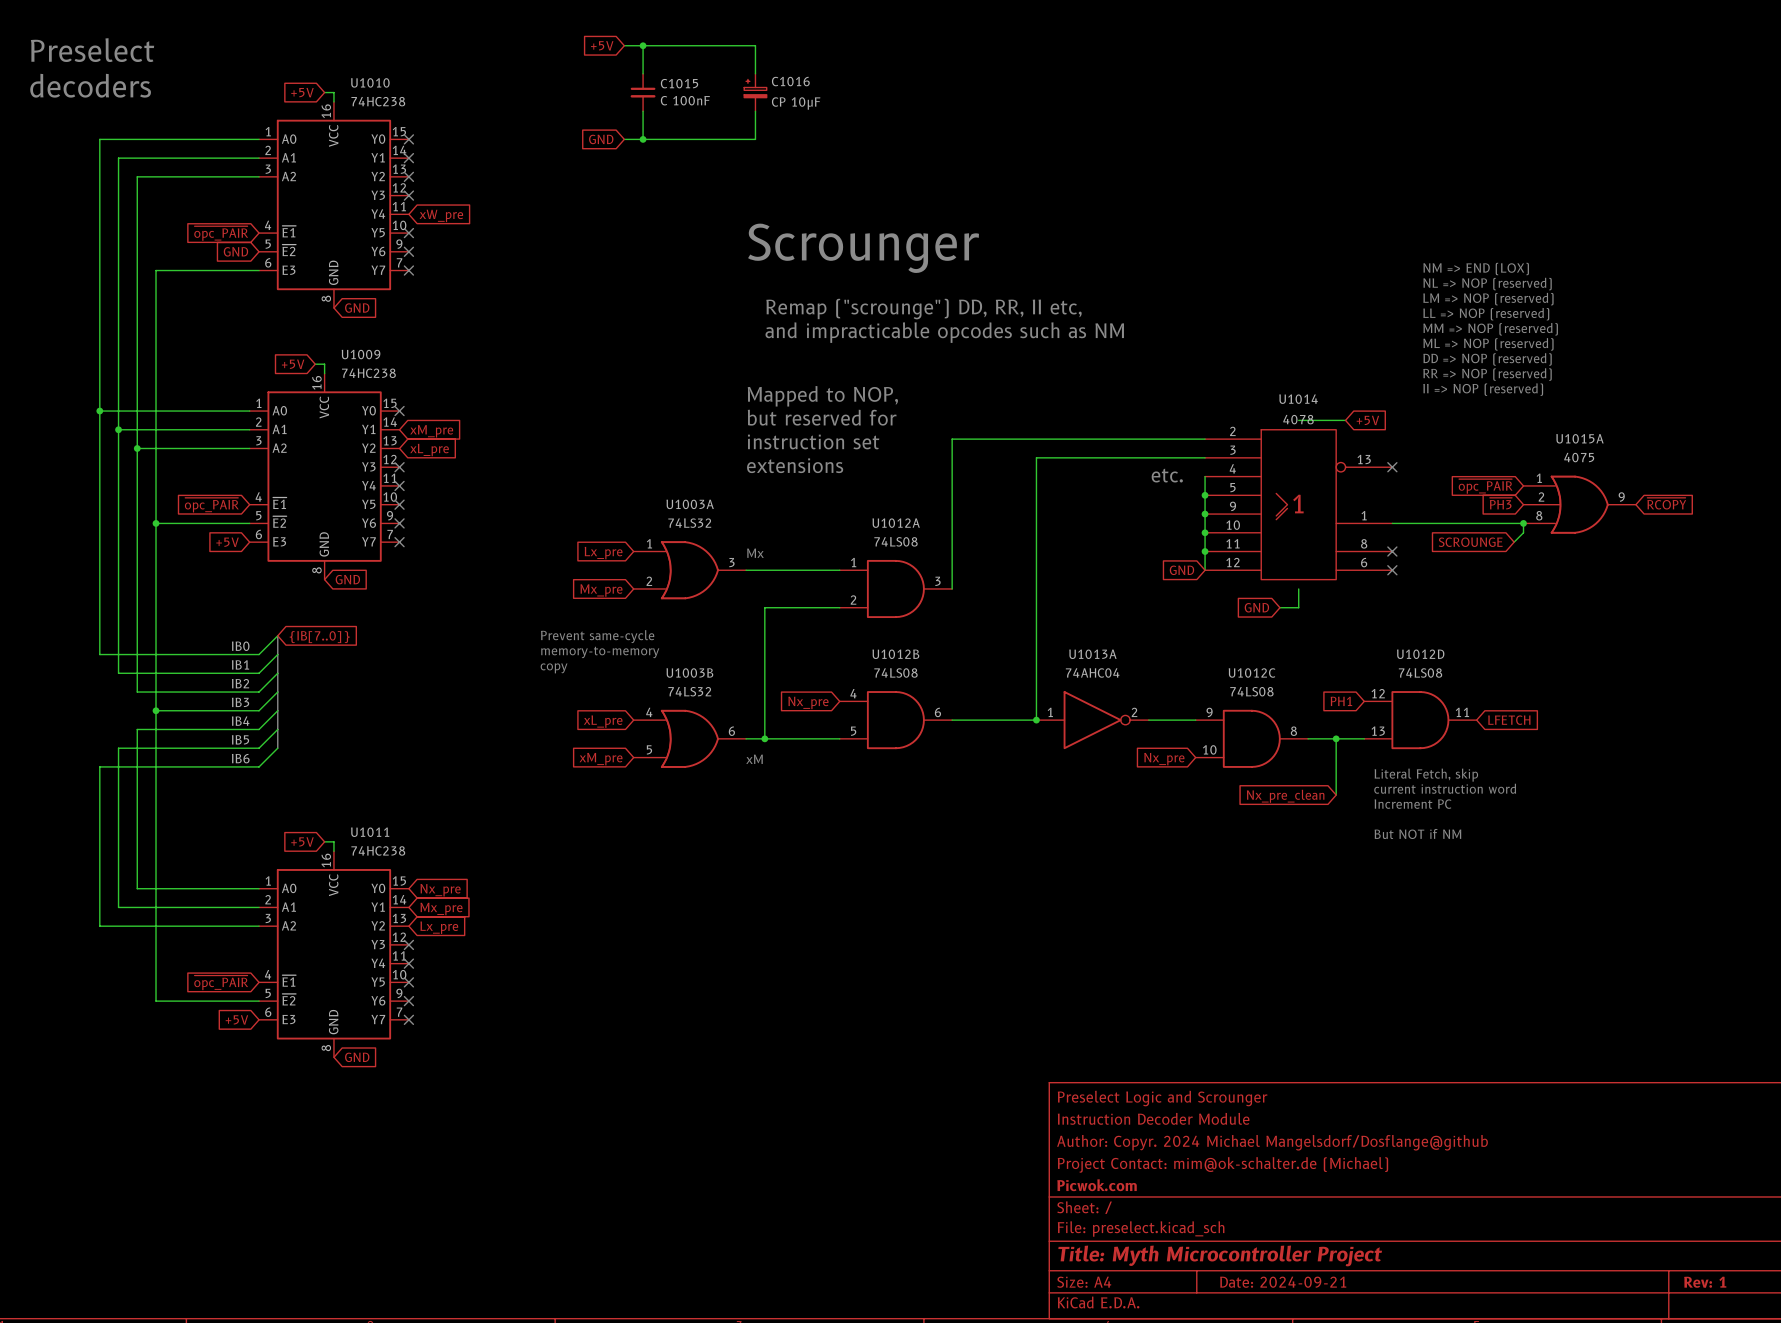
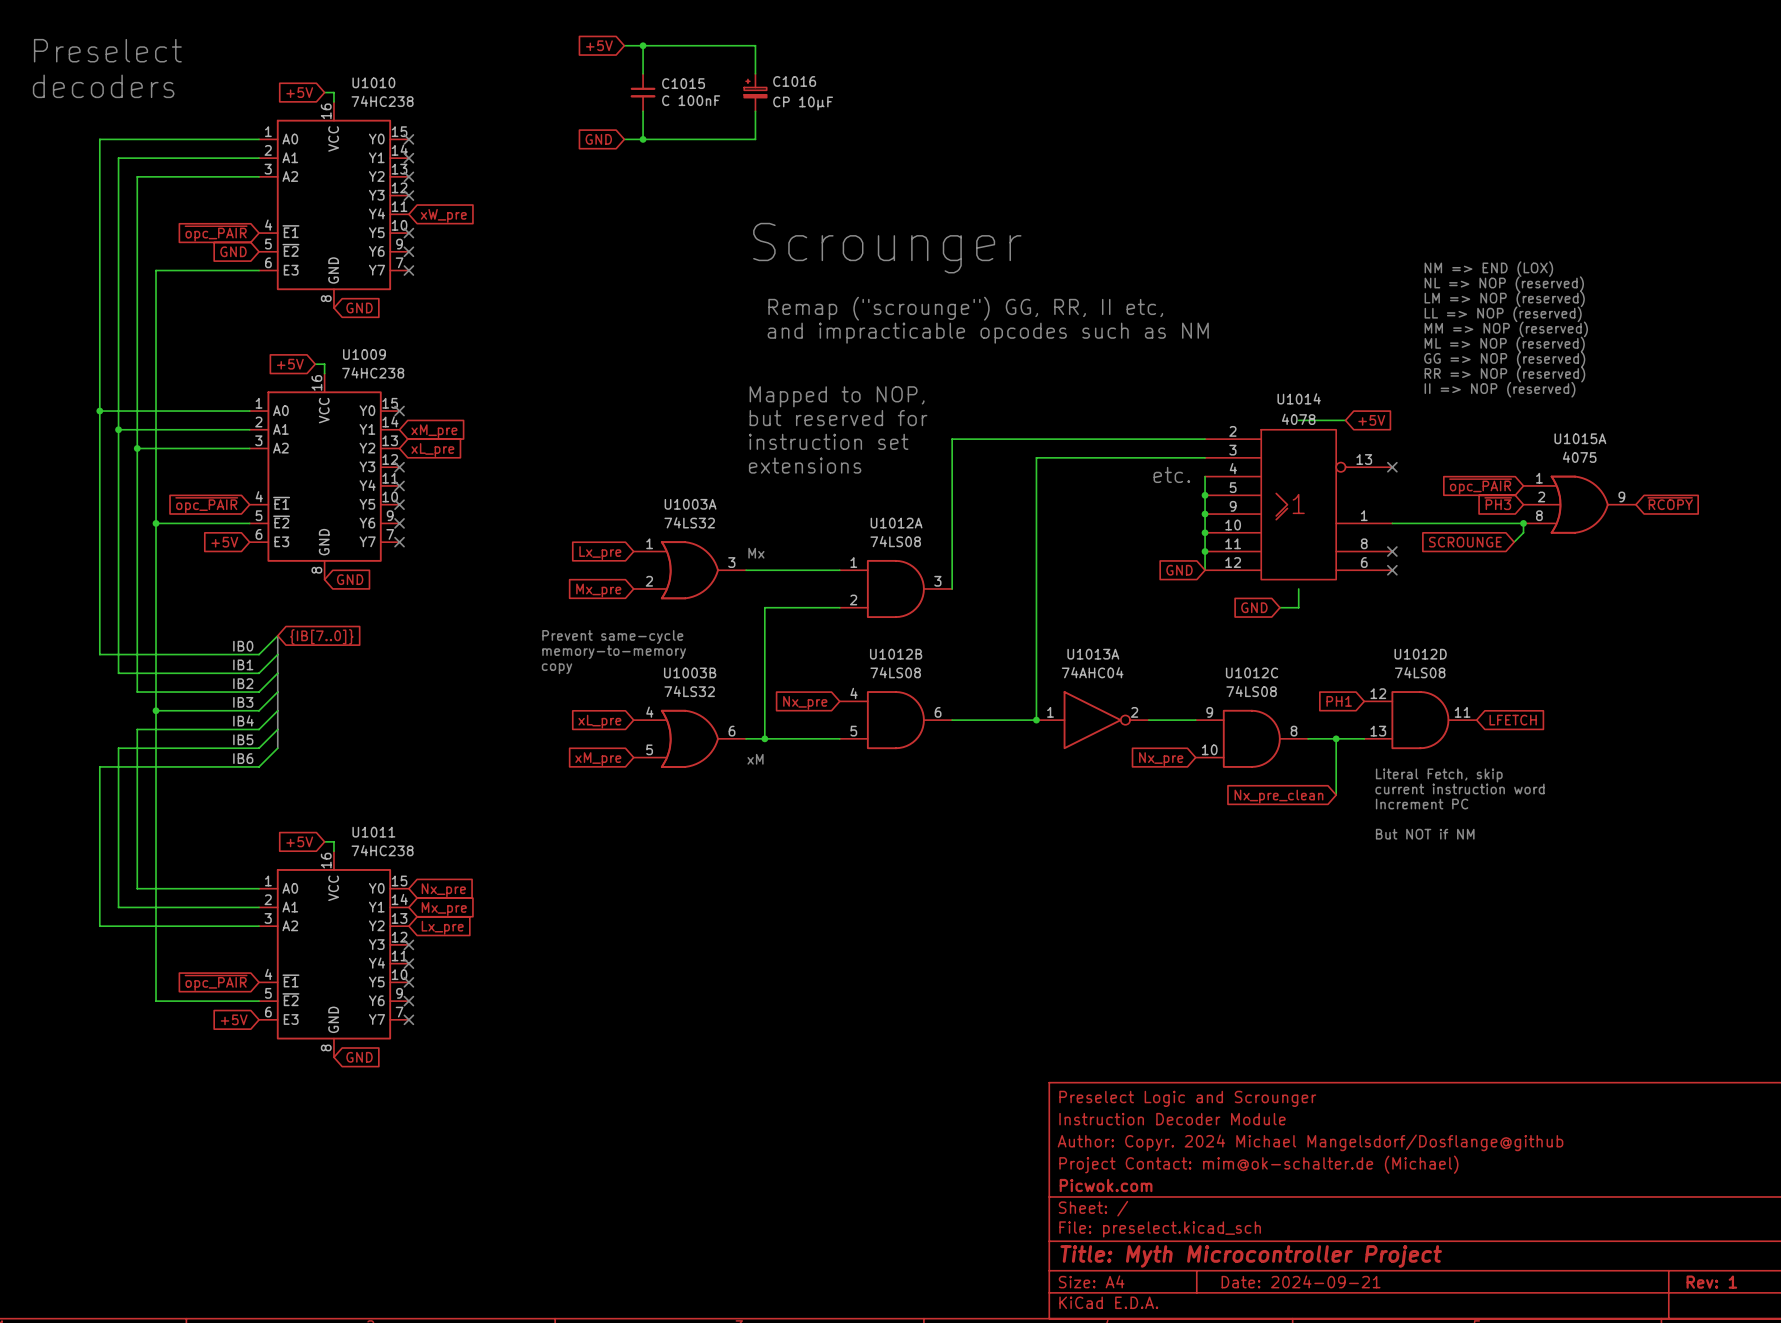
text: Remap ("scrounge") DD, RR, II etc, (923, 309) -> Remap ("scrounge") GG, RR, II etc, (965, 308)
text: DD => NOP (reserved) (1487, 359) -> GG => NOP (reserved) (1504, 359)

